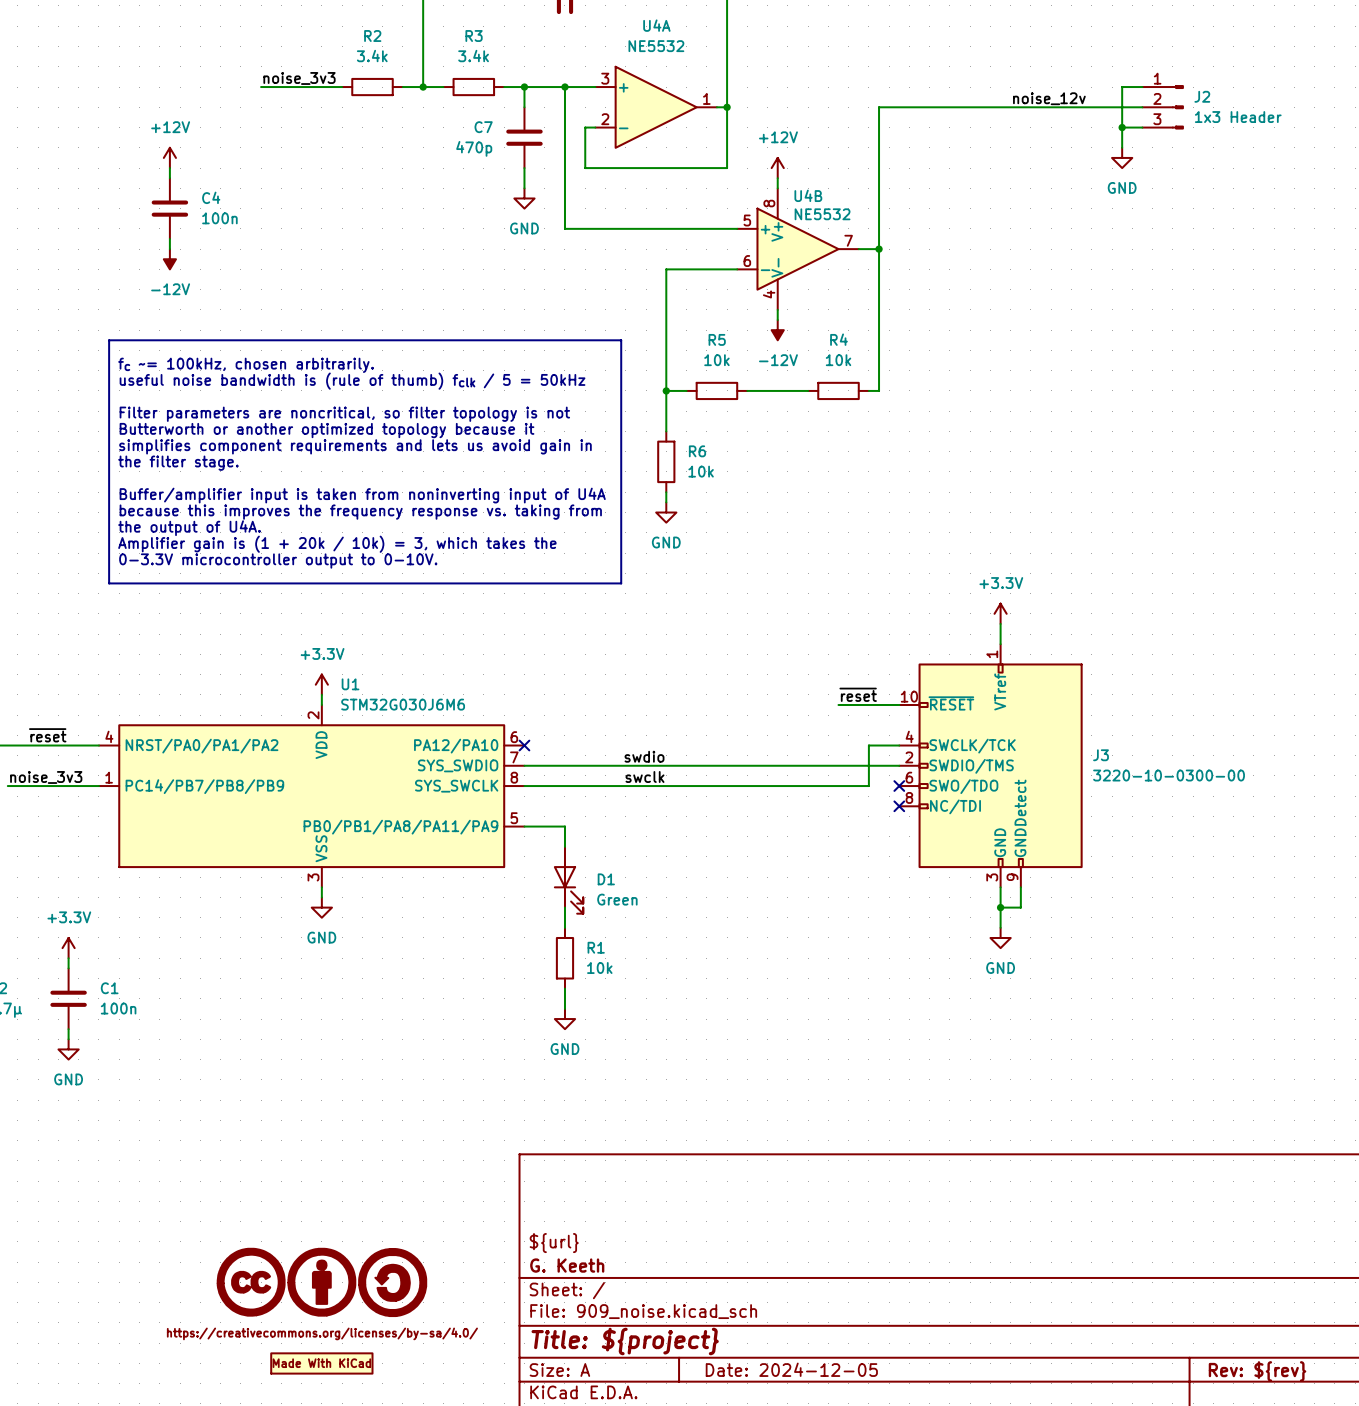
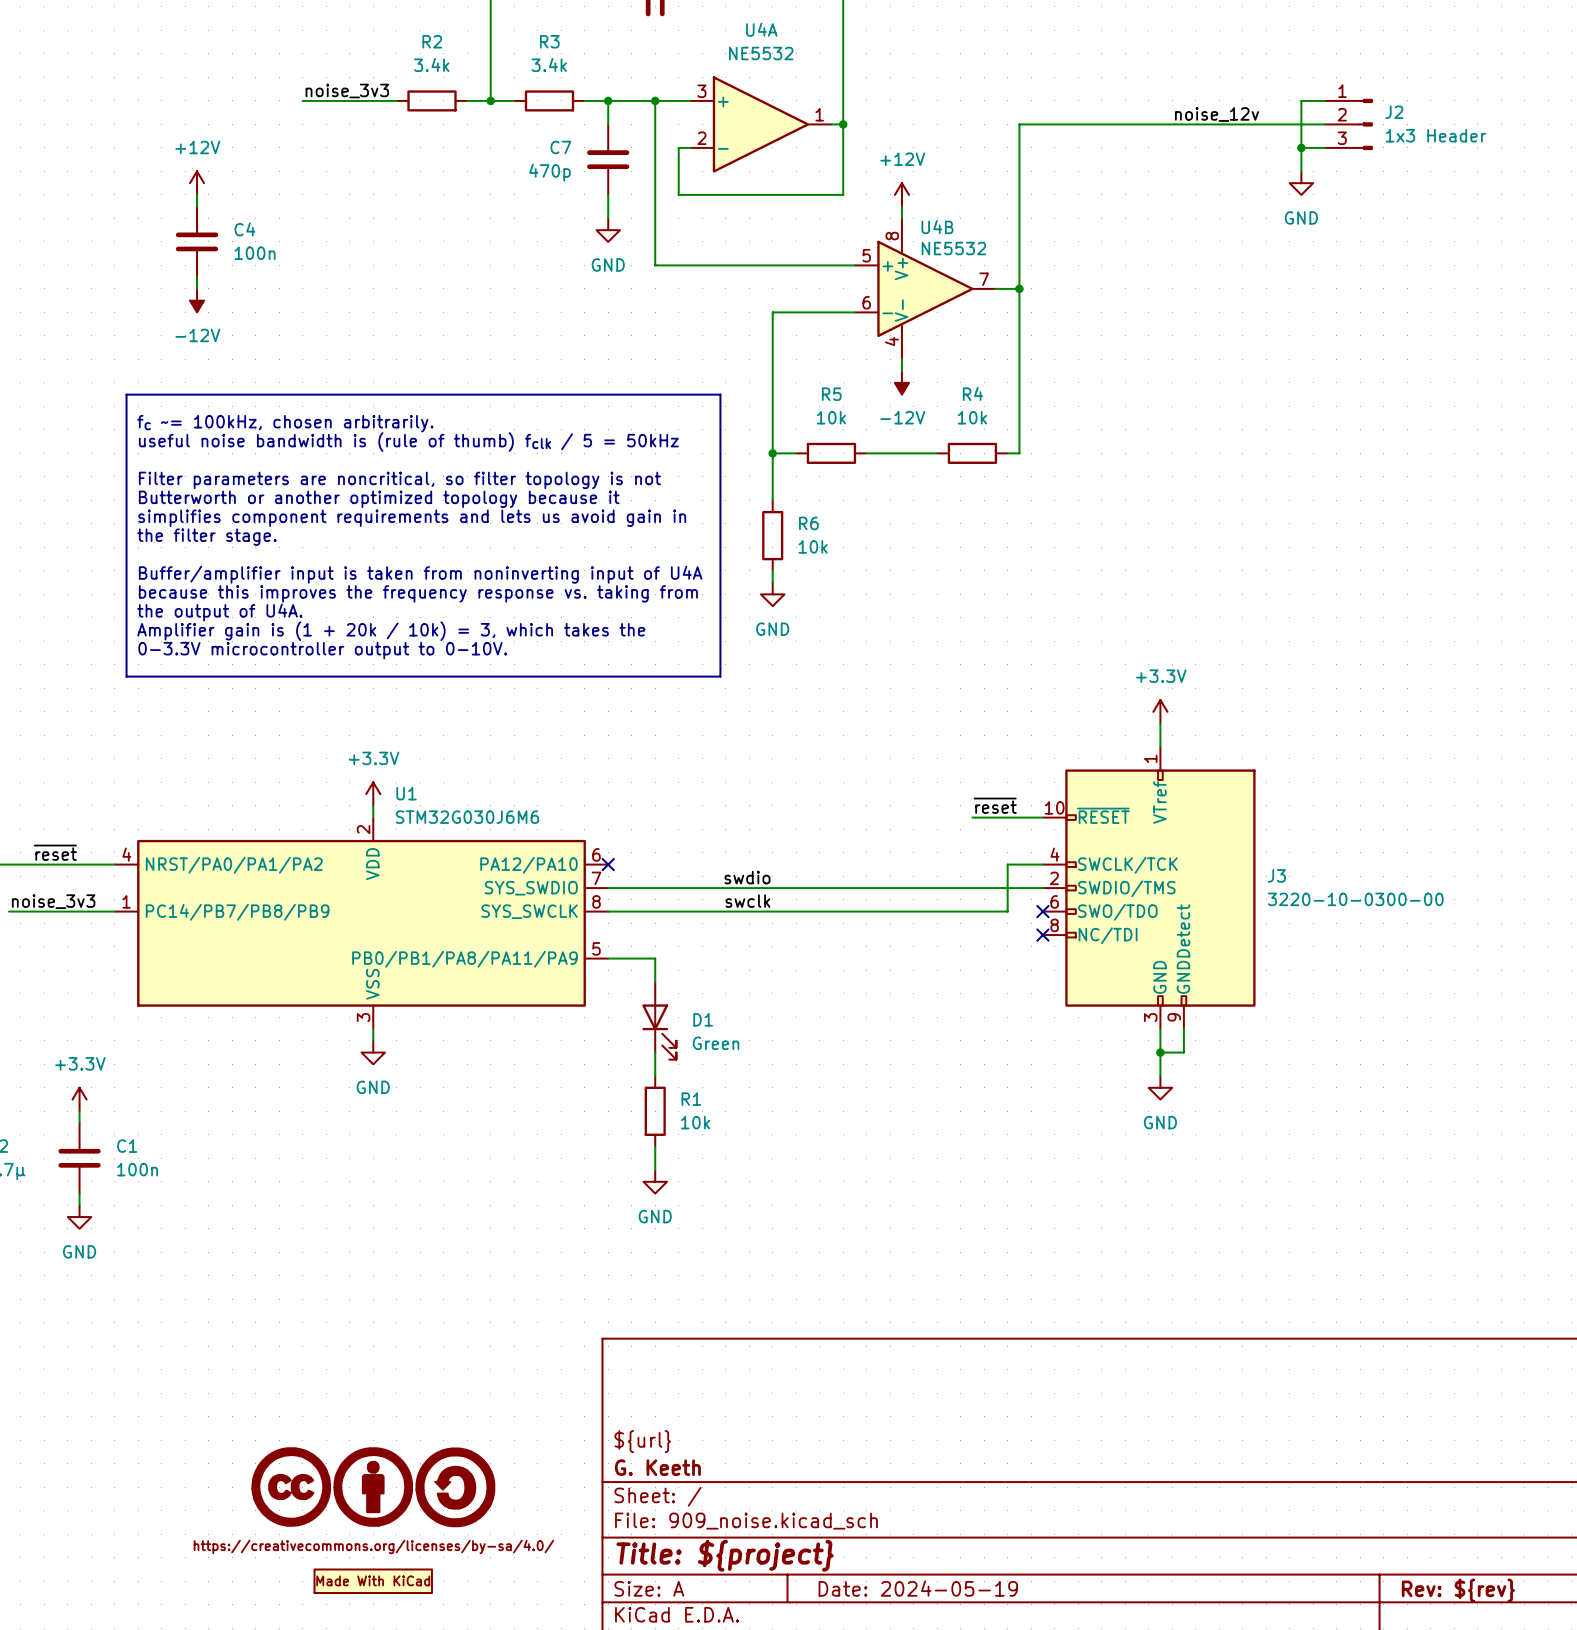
title block: Date: 2024-12-05 (791, 1369) -> Date: 2024-05-19 (918, 1588)

